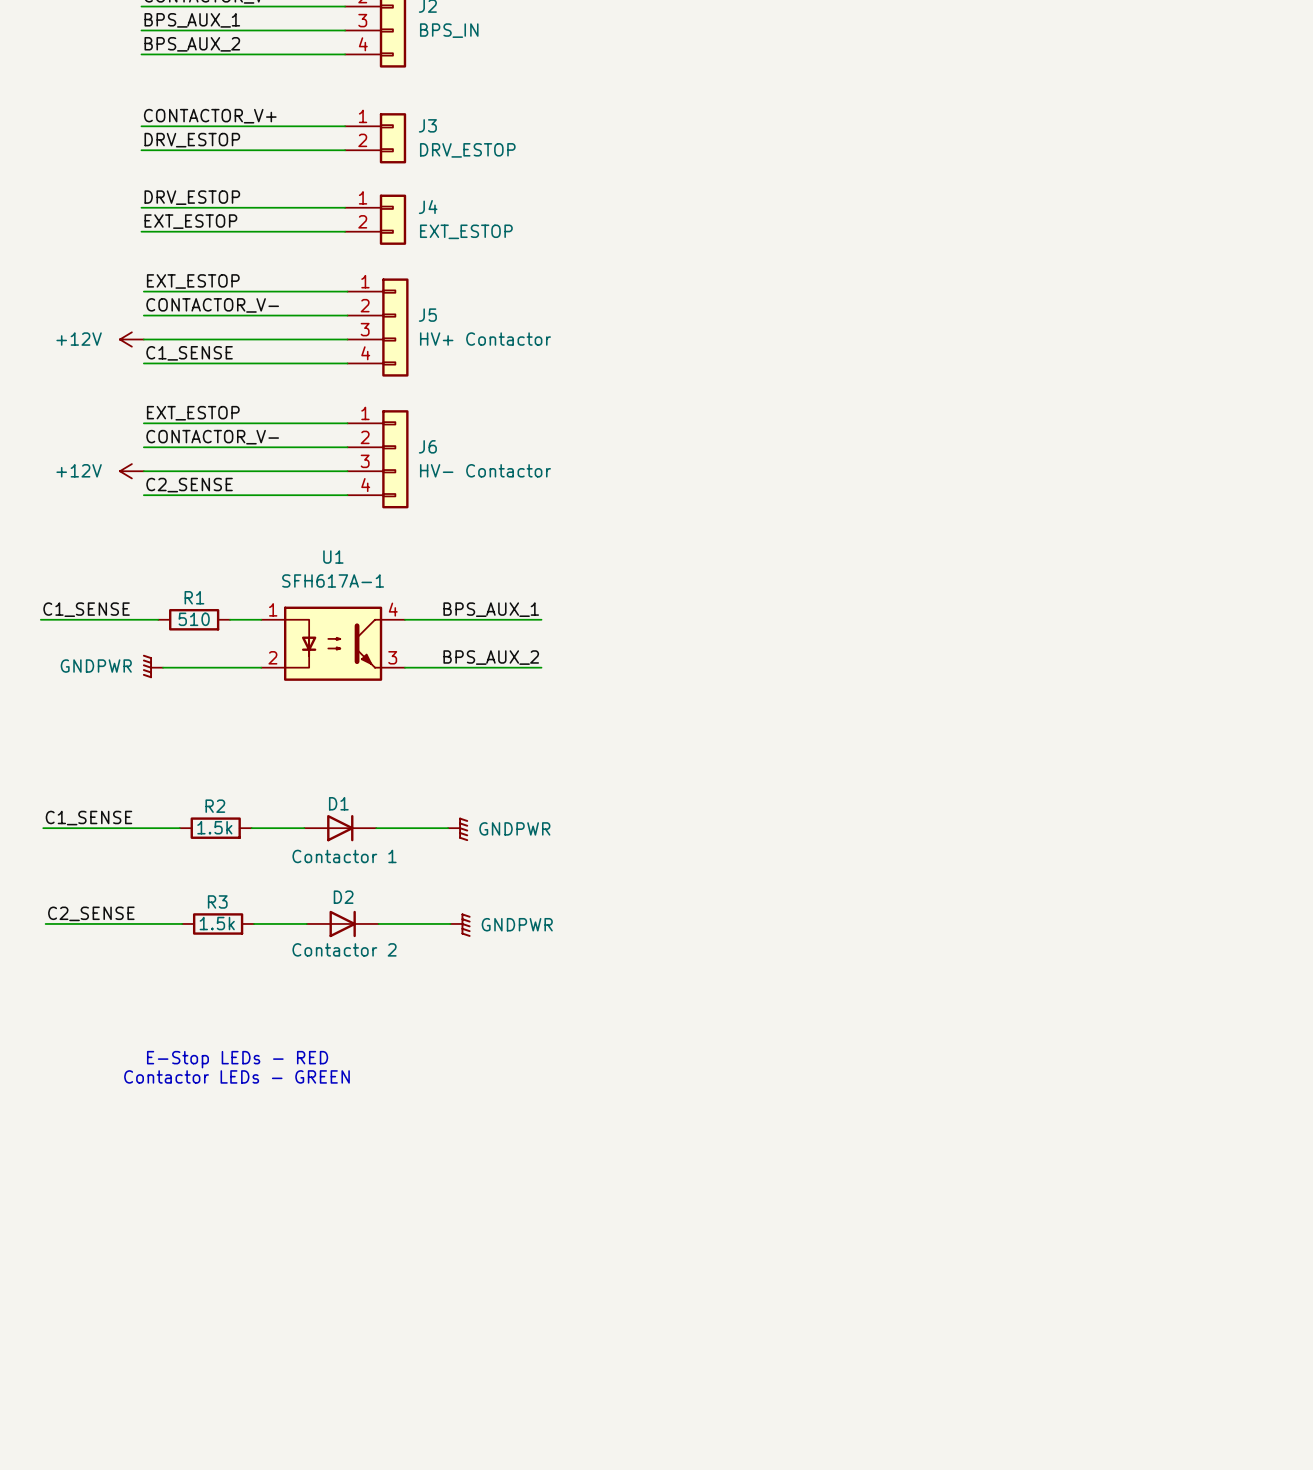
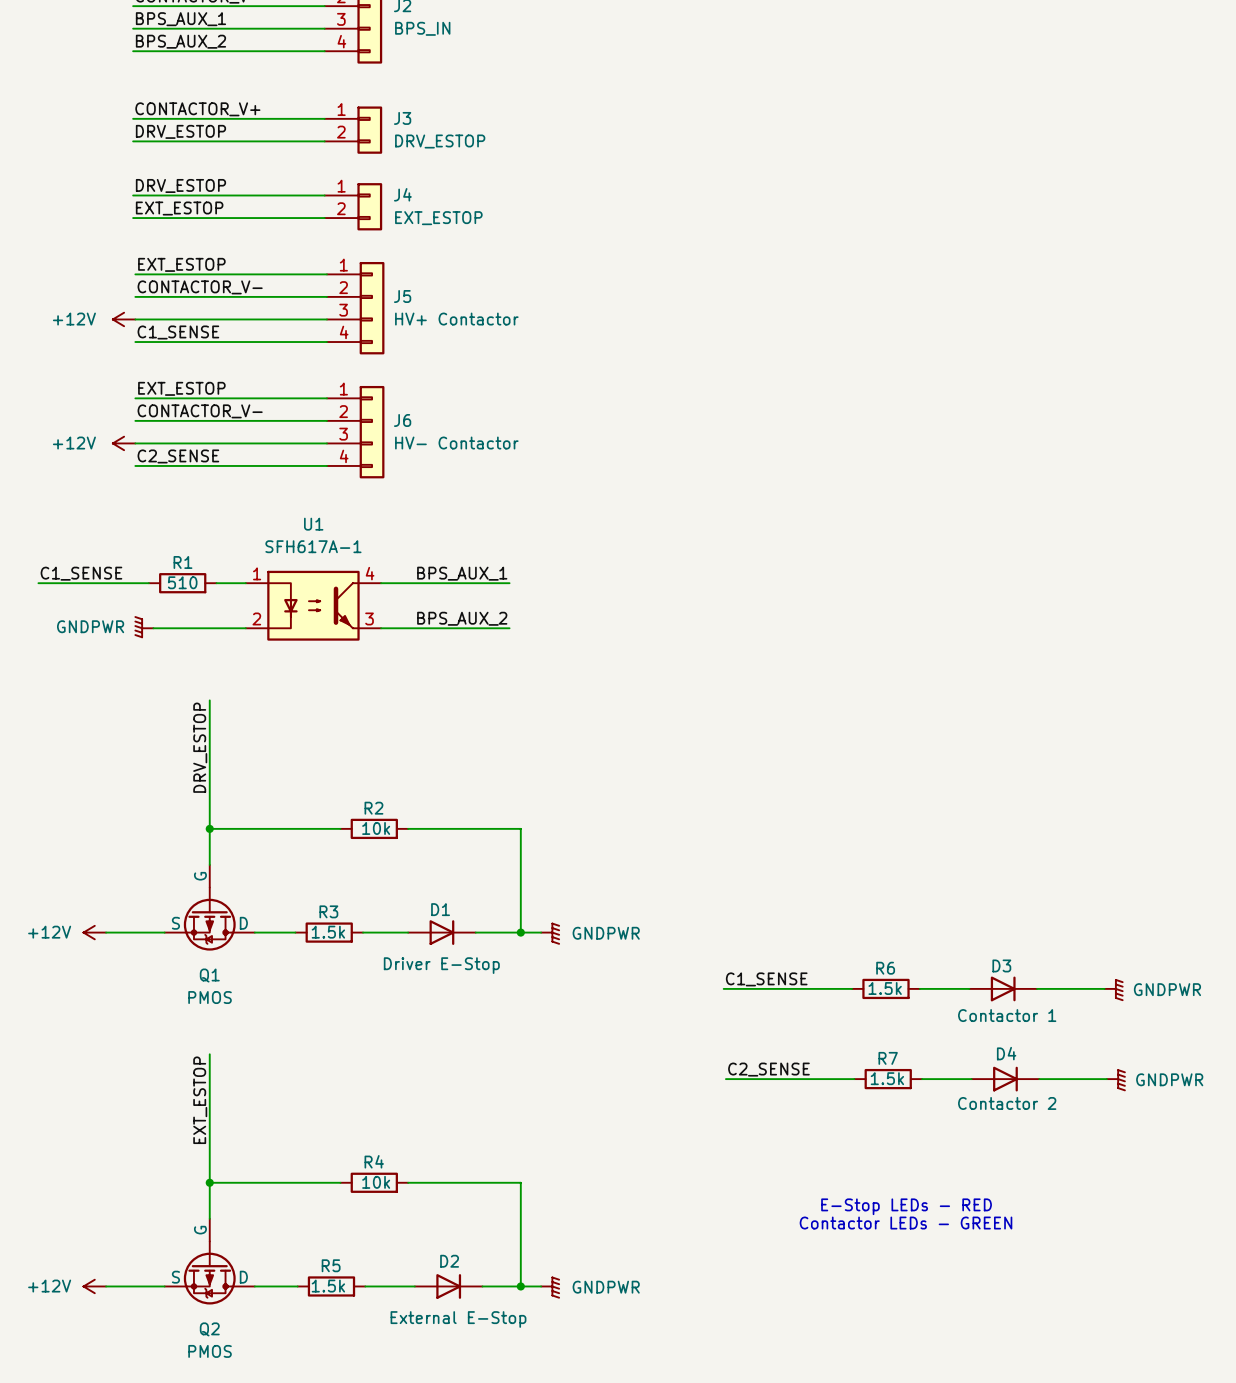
wire: none -> (209, 700) (209, 864)
label: none -> DRV_ESTOP (200, 747)
label: C1_SENSE (88, 818) -> none
R2 value: 1.5k (214, 827) -> 10k (376, 828)
wire: (43, 828) (179, 828) -> none
R2 position: (215, 828) -> (374, 828)
wire: (251, 828) (304, 828) -> none
D1 position: (340, 828) -> (441, 932)
wire: (376, 828) (448, 828) -> none
power symbol: GNDPWR (458, 829) -> none
D1 value: Contactor 1 (344, 856) -> Driver E-Stop (441, 965)
wire: none -> (209, 828) (340, 828)
junction: none -> (209, 828)
wire: none -> (408, 828) (520, 828) (520, 932)
label: C2_SENSE (91, 913) -> none
wire: (45, 923) (182, 923) -> none
R3 position: (218, 923) -> (329, 932)
wire: (254, 923) (306, 923) -> none
D2 position: (342, 923) -> (448, 1286)
wire: (378, 923) (450, 923) -> none
power symbol: GNDPWR (460, 925) -> none
D2 value: Contactor 2 (344, 949) -> External E-Stop (458, 1319)
Q1: none -> PMOS (209, 907)
power symbol: none -> +12V (94, 932)
wire: none -> (106, 932) (164, 932)
wire: none -> (254, 932) (295, 932)
wire: none -> (363, 932) (408, 932)
wire: none -> (475, 932) (541, 932)
junction: none -> (520, 932)
power symbol: none -> GNDPWR (550, 933)
label: none -> C1_SENSE (766, 979)
wire: none -> (723, 988) (852, 988)
R6: none -> 1.5k (885, 988)
wire: none -> (919, 988) (969, 988)
D3: none -> Contactor 1 (1003, 988)
wire: none -> (1037, 988) (1104, 988)
power symbol: none -> GNDPWR (1114, 990)
text: E-Stop LEDs - RED (237, 1059) -> none
text: Contactor LEDs - GREEN (237, 1076) -> none
wire: none -> (209, 1054) (209, 1218)
label: none -> C2_SENSE (768, 1069)
wire: none -> (725, 1079) (854, 1079)
R7: none -> 1.5k (888, 1079)
wire: none -> (922, 1079) (971, 1079)
D4: none -> Contactor 2 (1005, 1079)
wire: none -> (1039, 1079) (1106, 1079)
power symbol: none -> GNDPWR (1116, 1080)
label: none -> EXT_ESTOP (200, 1100)
wire: none -> (209, 1182) (340, 1182)
junction: none -> (209, 1182)
R4: none -> 10k (374, 1182)
wire: none -> (408, 1182) (520, 1182) (520, 1286)
text: none -> E-Stop LEDs - RED (906, 1206)
text: none -> Contactor LEDs - GREEN (906, 1223)
Q2: none -> PMOS (209, 1261)
power symbol: none -> +12V (94, 1286)
wire: none -> (106, 1286) (164, 1286)
wire: none -> (254, 1286) (297, 1286)
R5: none -> 1.5k (331, 1286)
wire: none -> (365, 1286) (414, 1286)
wire: none -> (482, 1286) (541, 1286)
junction: none -> (520, 1286)
power symbol: none -> GNDPWR (550, 1287)

